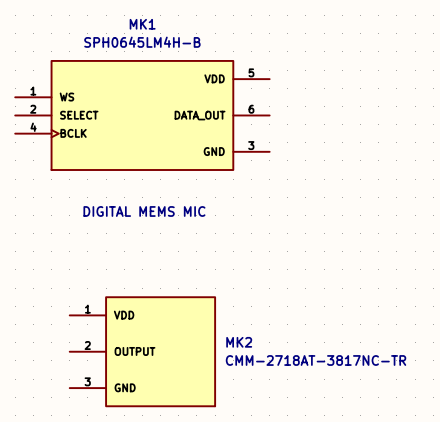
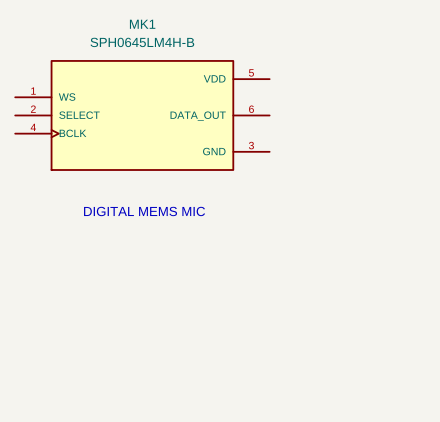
MK2: CMM-2718AT-3817NC-TR (142, 351) -> none

